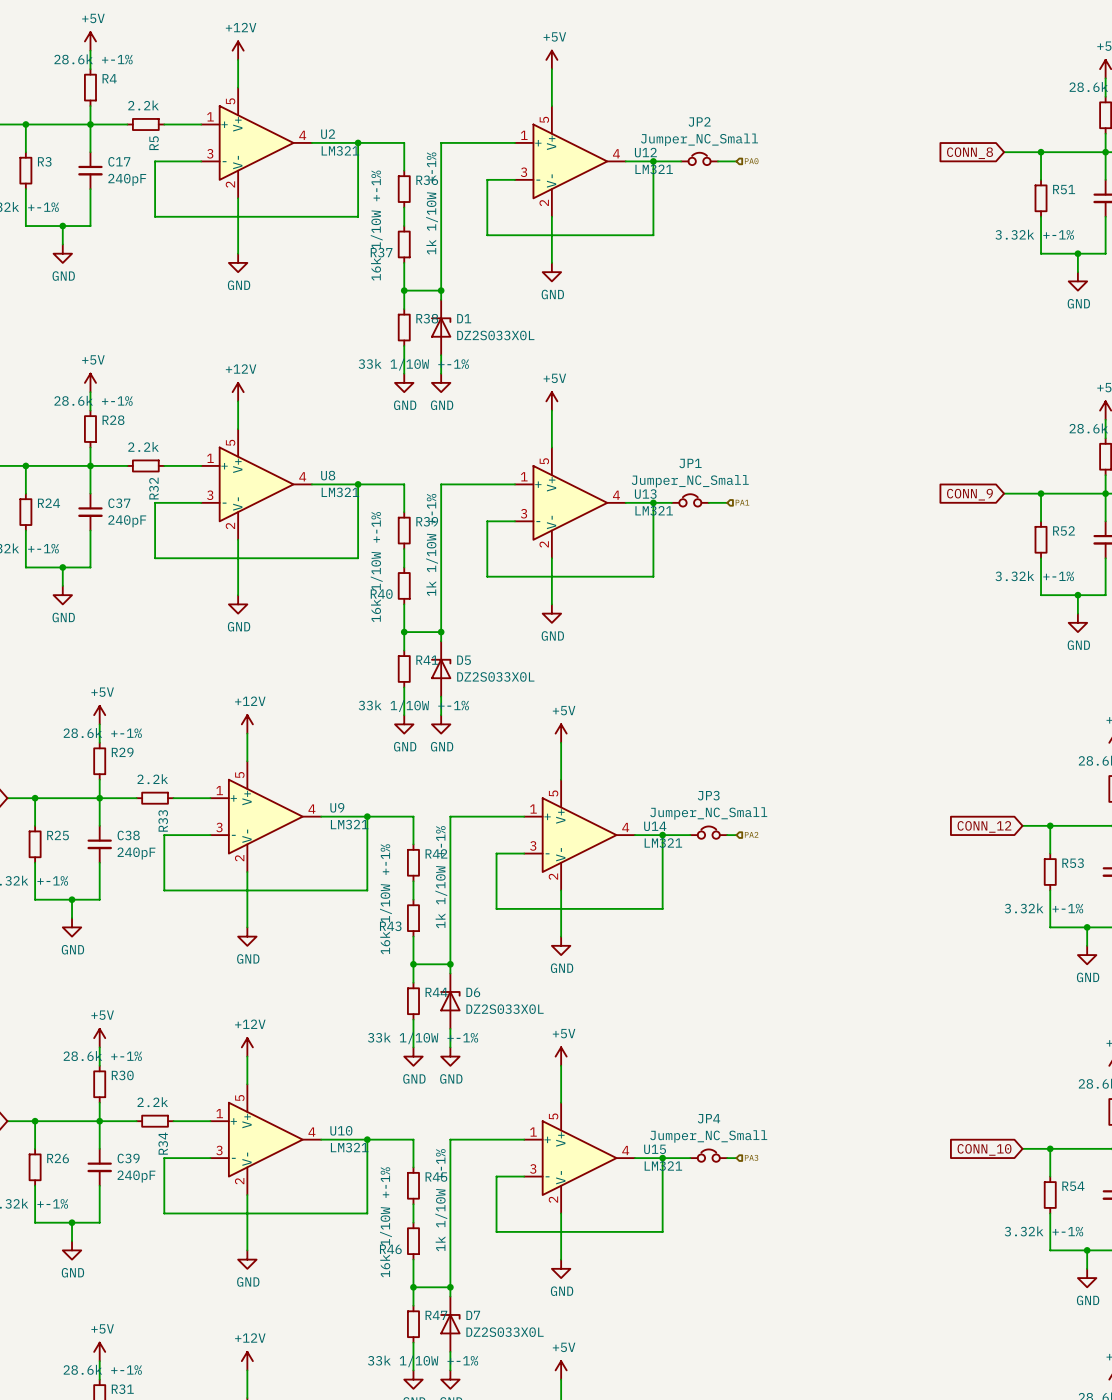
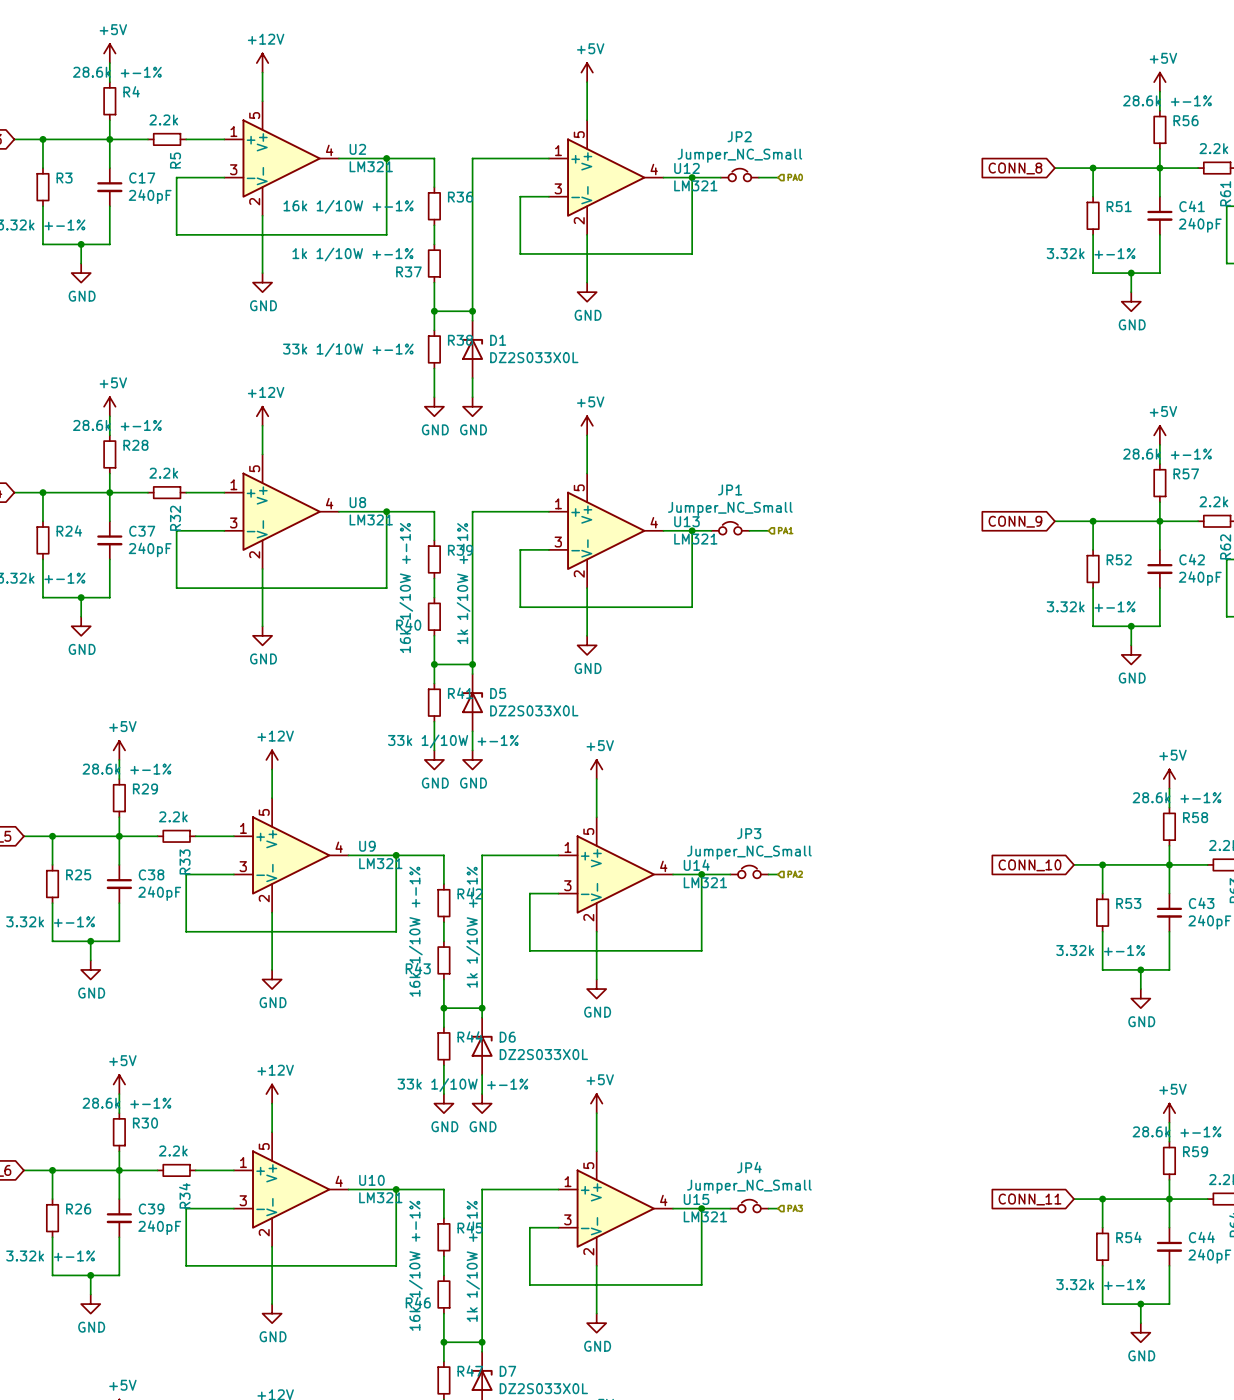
R37 value rotation: 0° (432, 203) -> 90° clockwise (352, 254)
R36 value rotation: 0° (376, 225) -> 90° clockwise (348, 206)
R38 value position: 33k 1/10W +-1% (413, 364) -> 33k 1/10W +-1% (348, 349)
global label: CONN_12 (984, 826) -> CONN_10 (1029, 865)
global label: CONN_10 (984, 1149) -> CONN_11 (1029, 1199)

